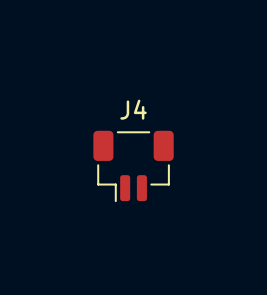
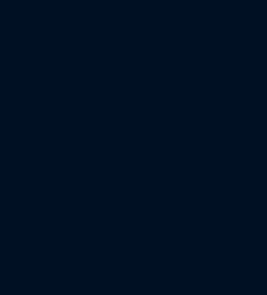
J4: (133, 166) -> none

